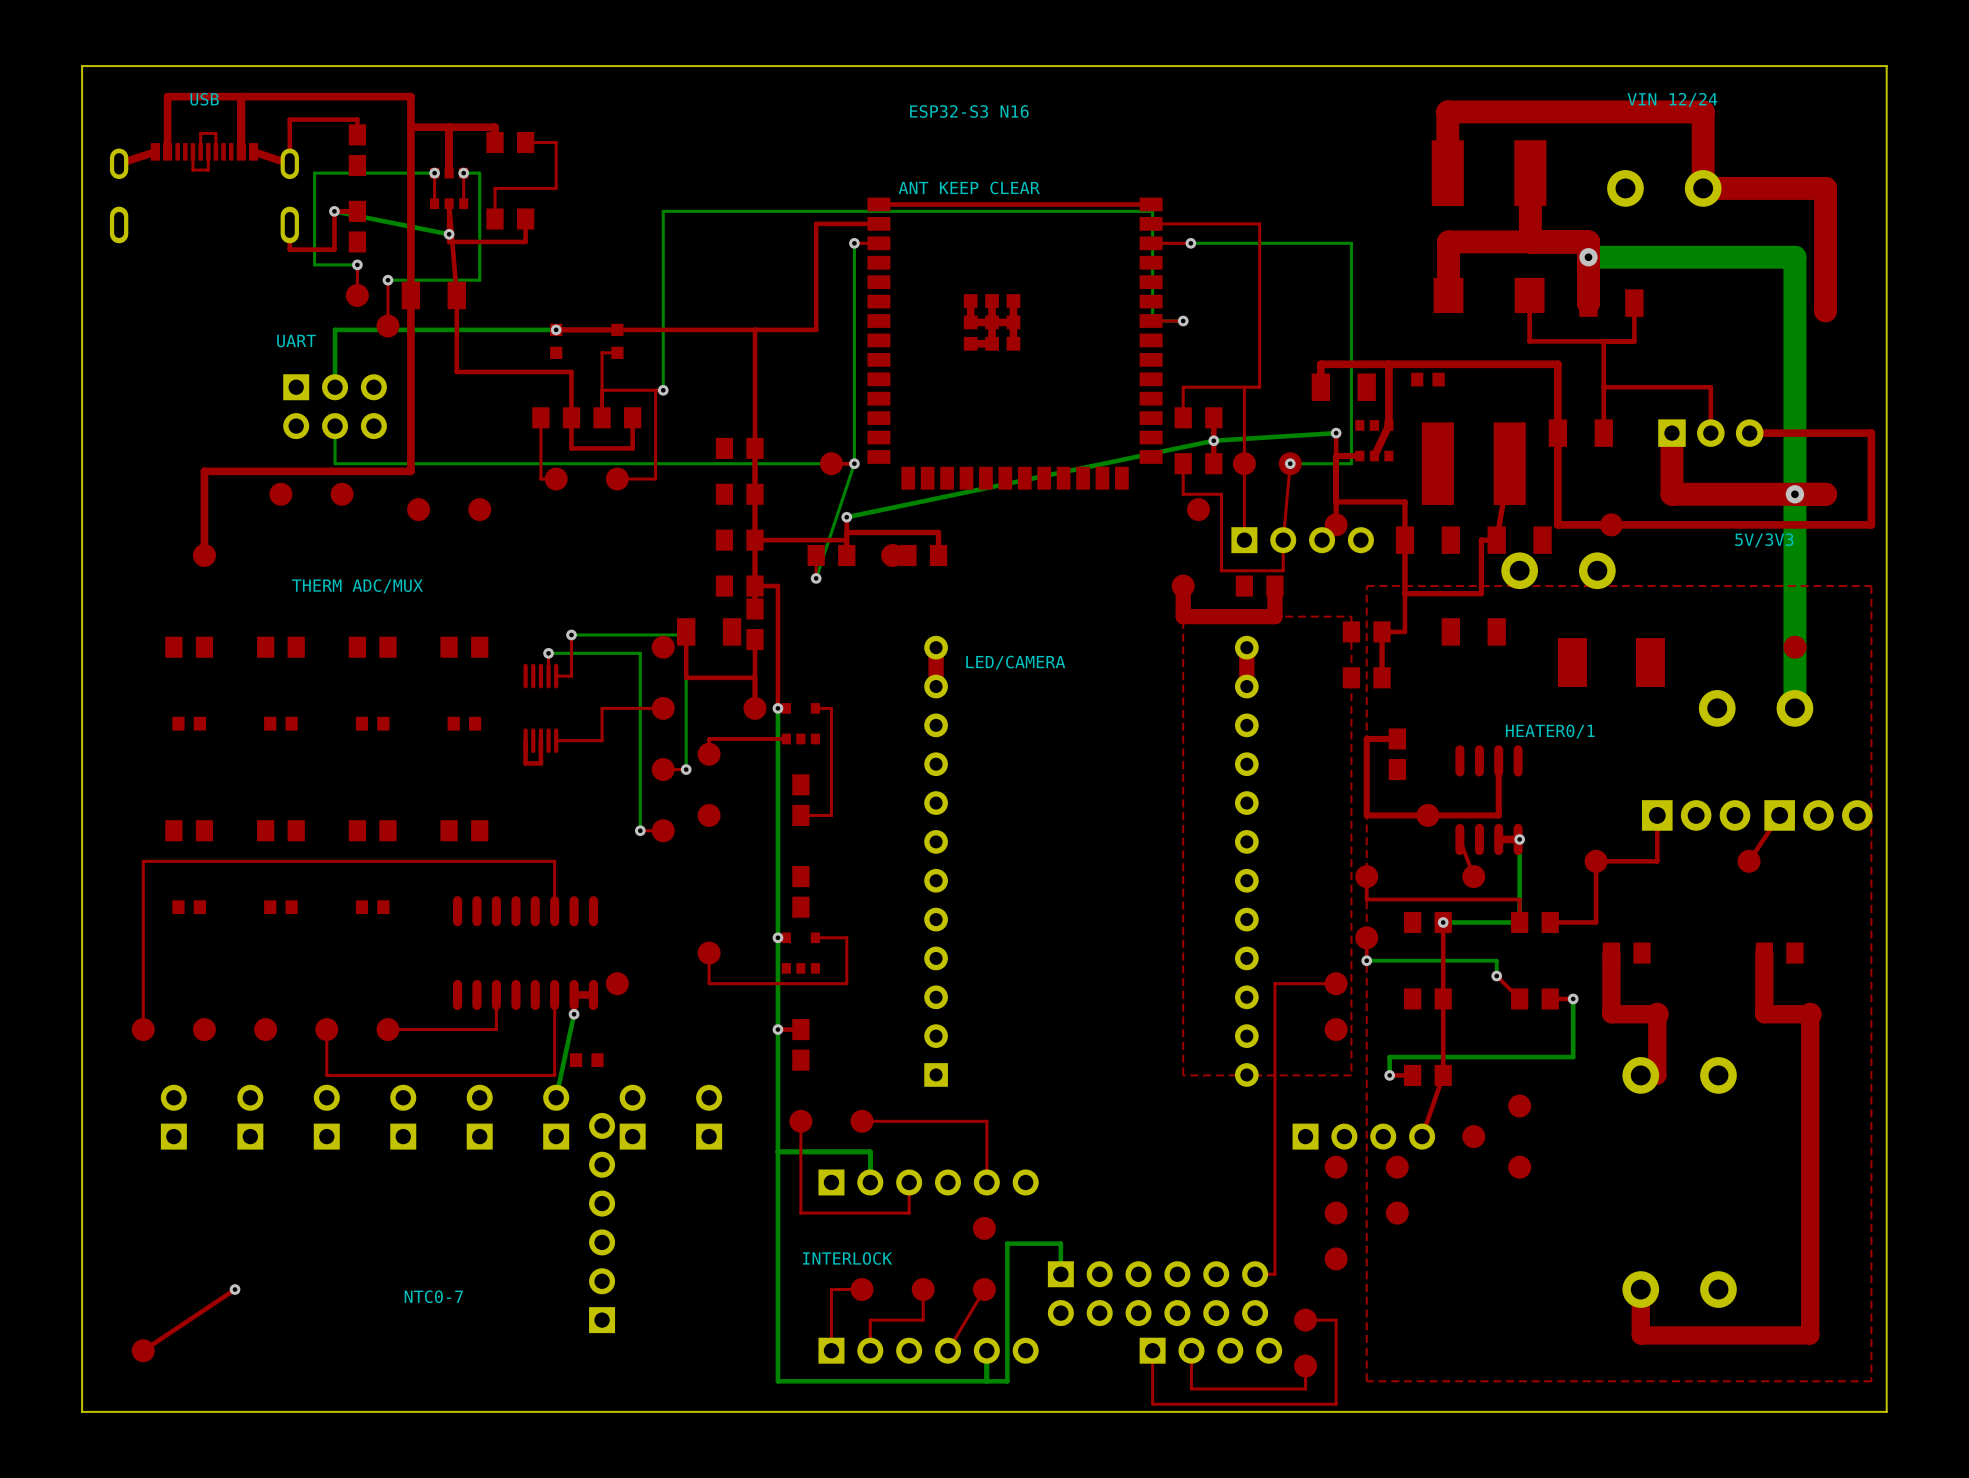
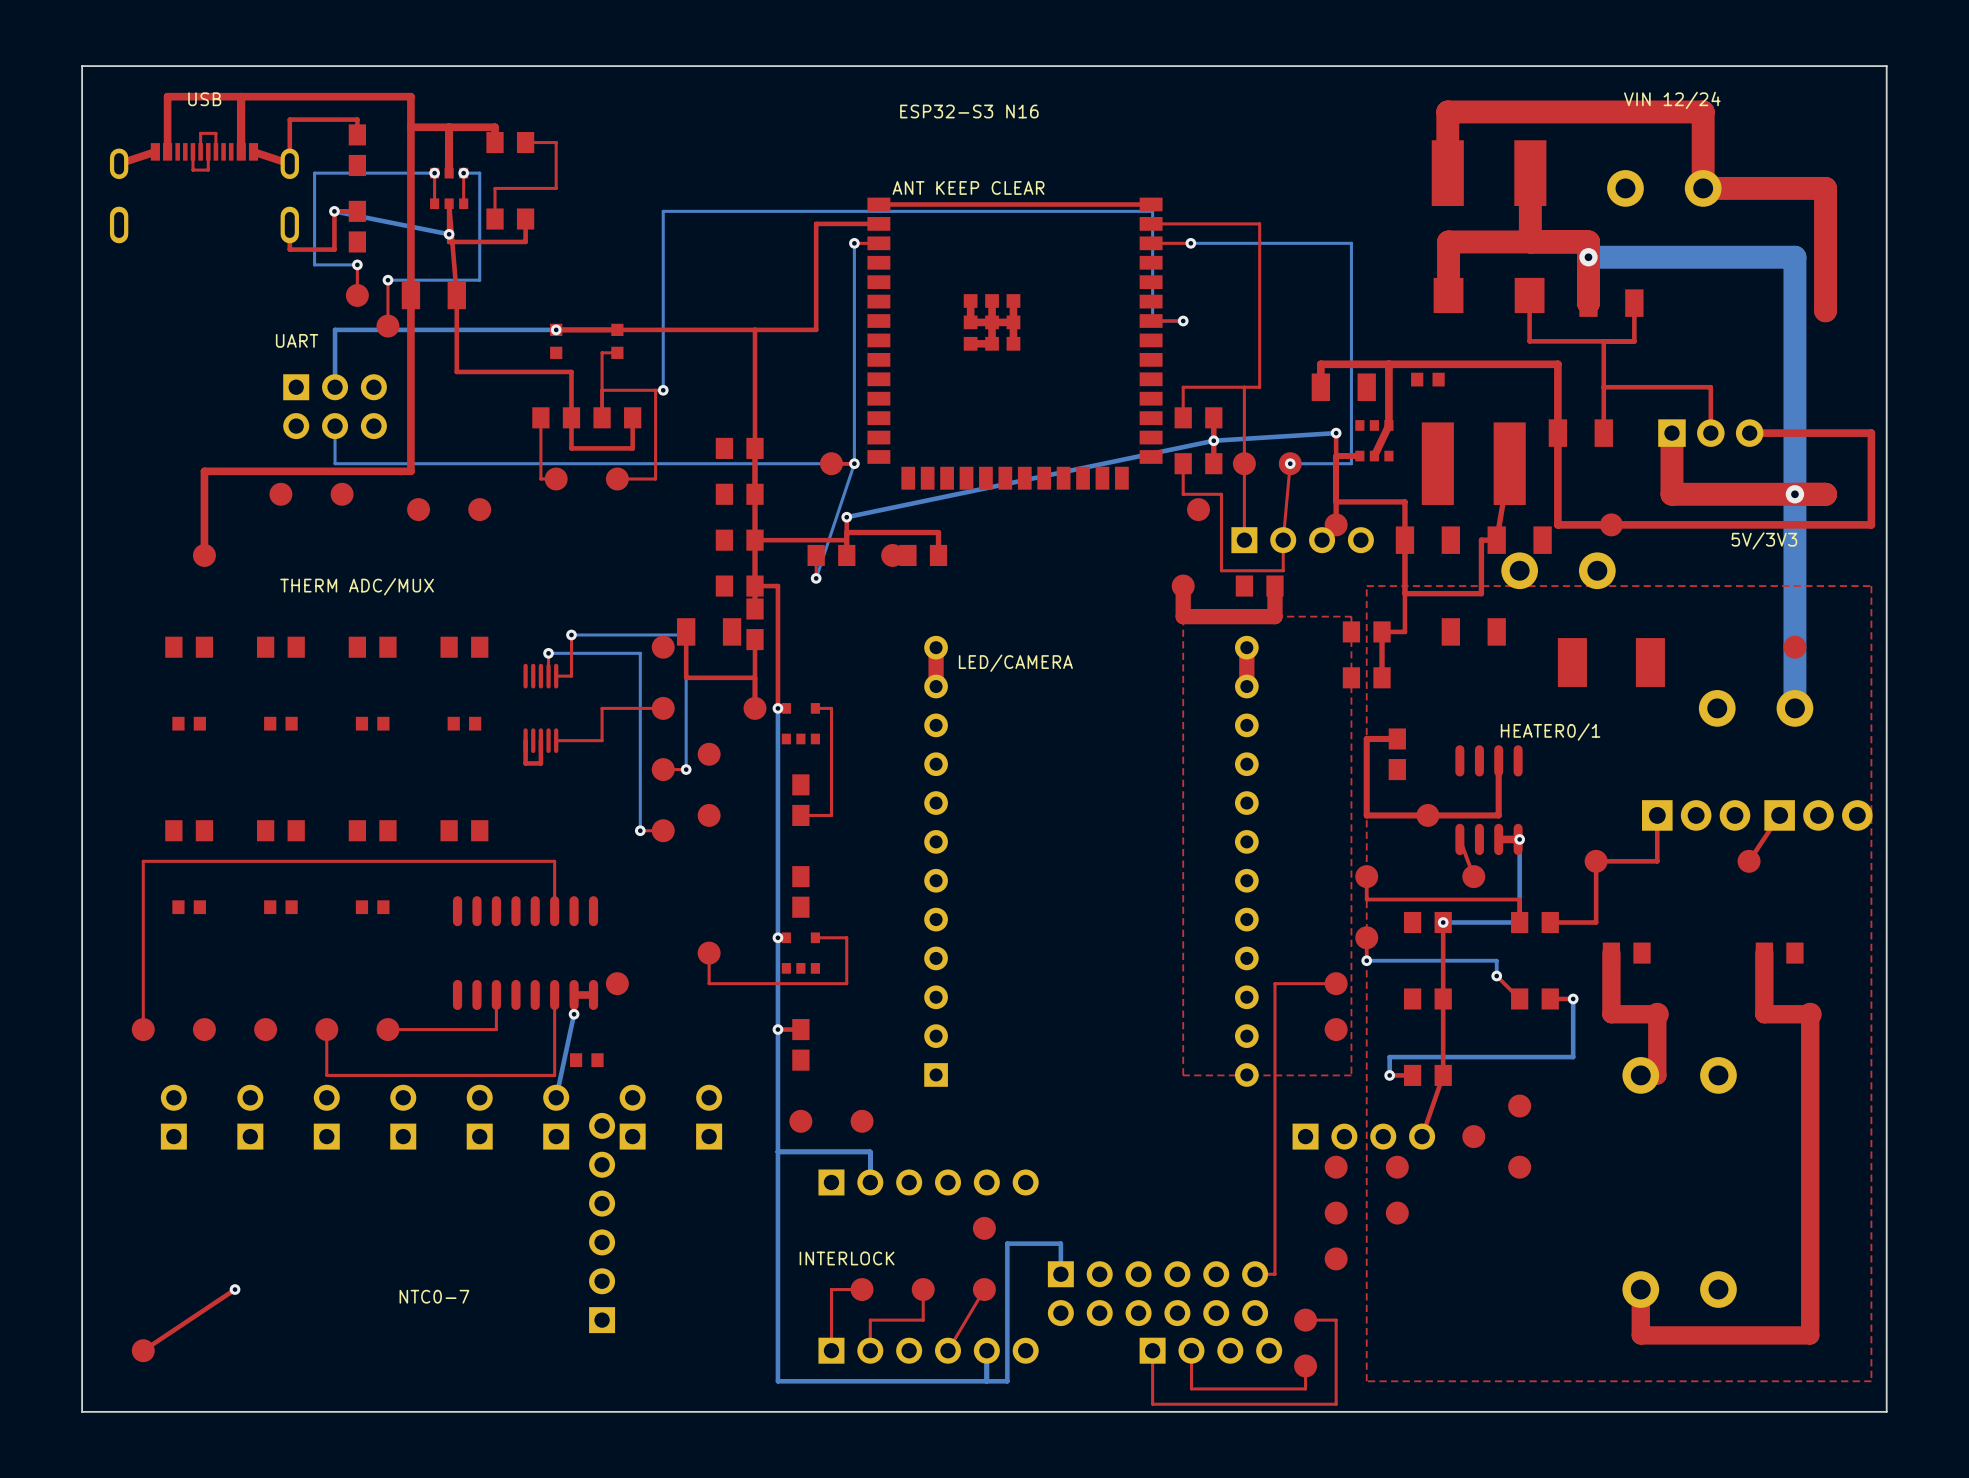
top track: (786, 738) (709, 738) (709, 754) -> none
top track: (800, 1121) (800, 1213) (909, 1213) (909, 1182) -> none
top track: (862, 1121) (986, 1121) (986, 1182) -> none

